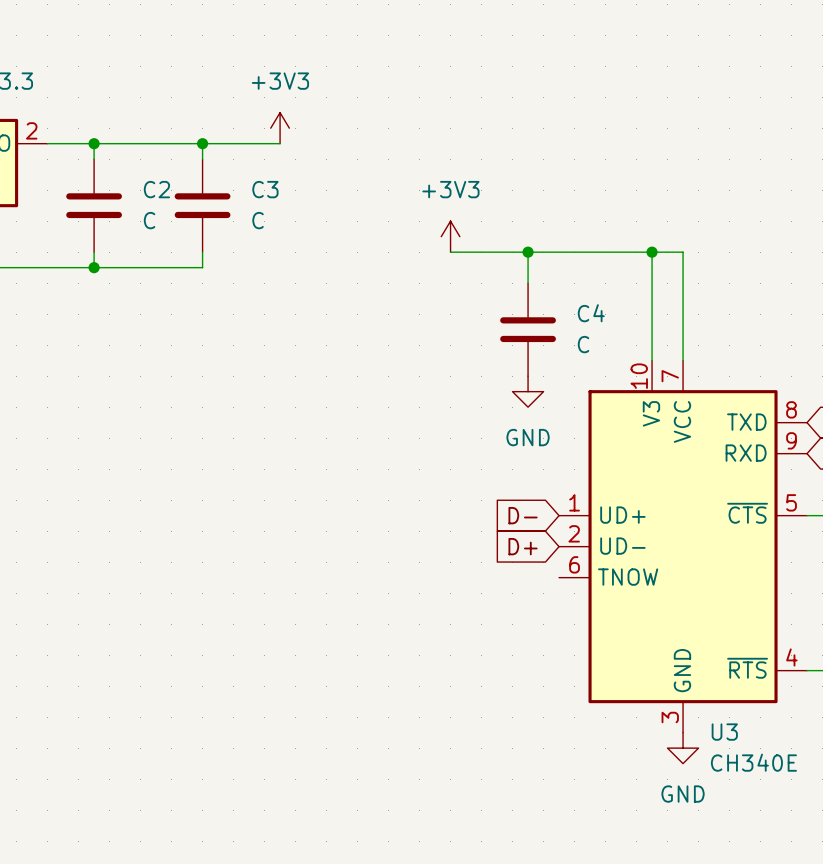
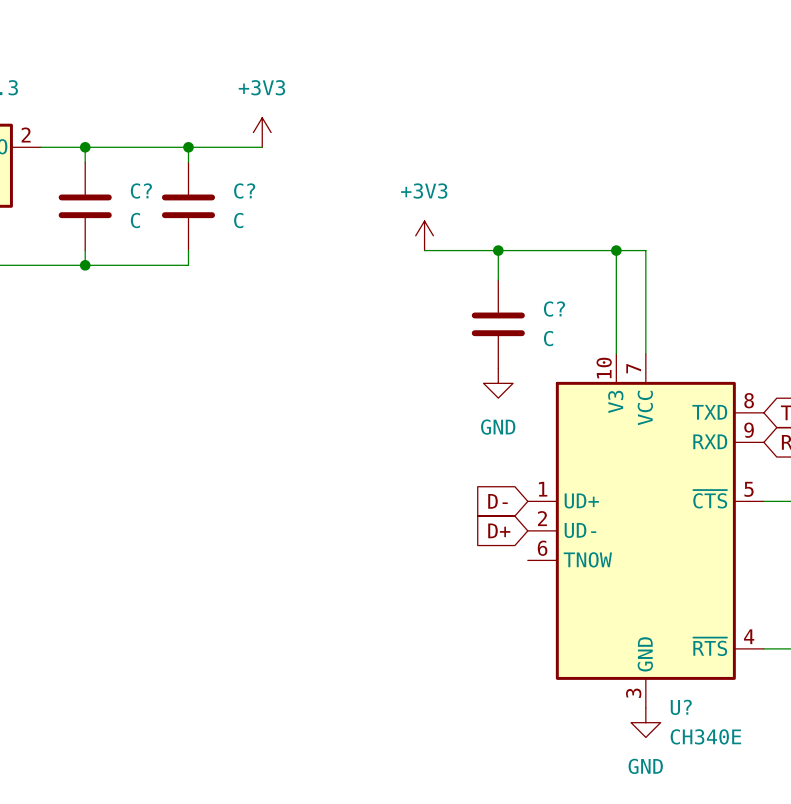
C2 name: C2 (156, 189) -> C? (141, 191)
C3 name: C3 (265, 189) -> C? (244, 191)
C4 name: C4 (591, 313) -> C? (554, 309)
U3 name: U3 (724, 732) -> U? (681, 707)

